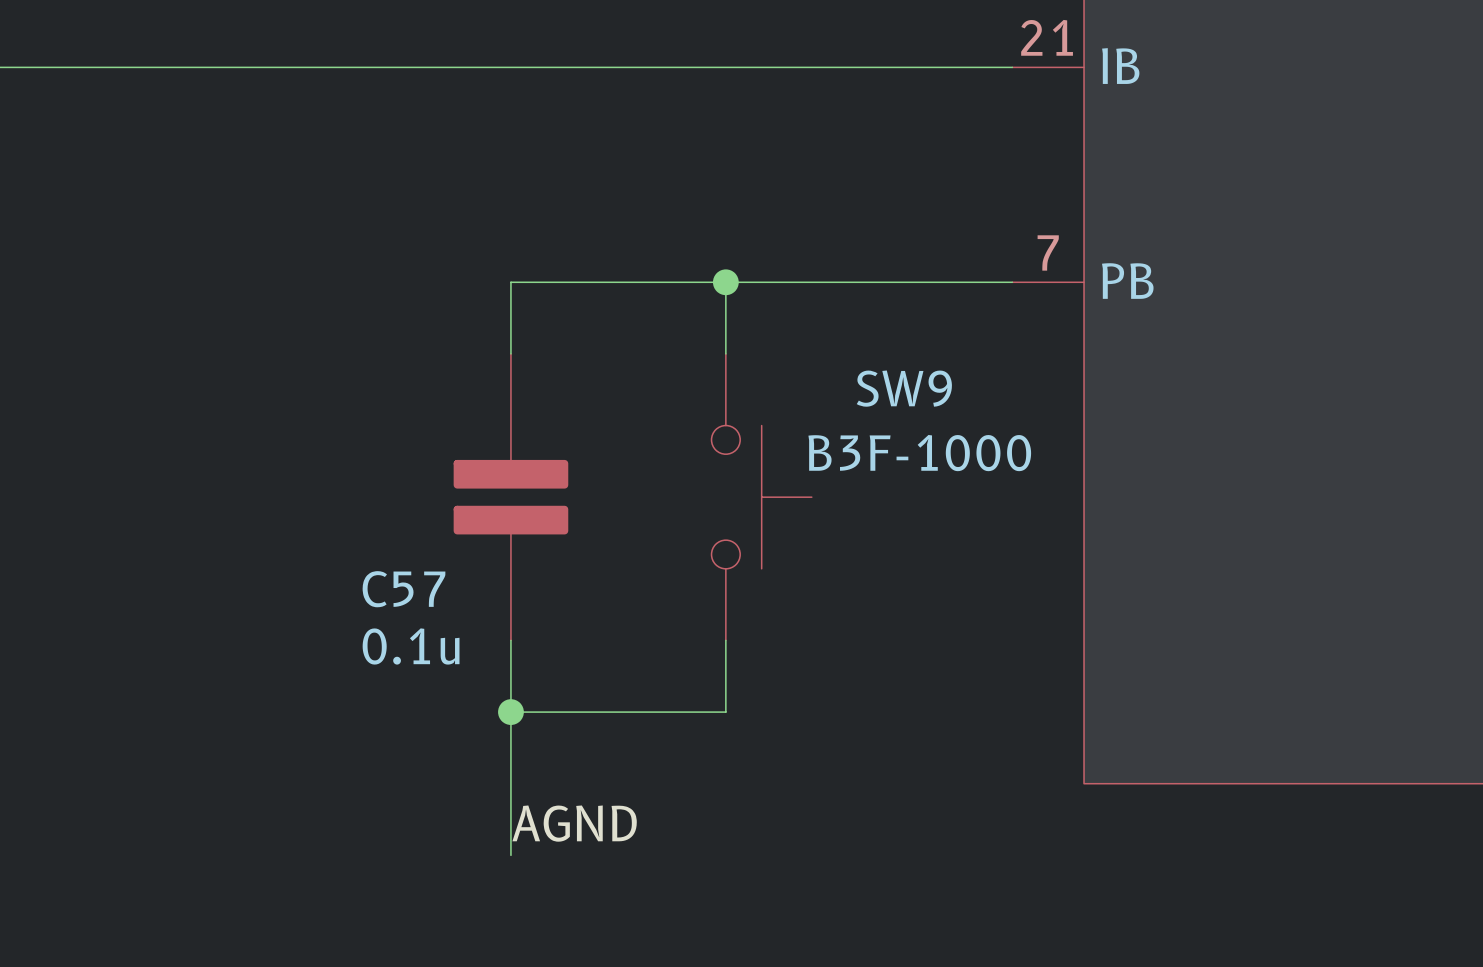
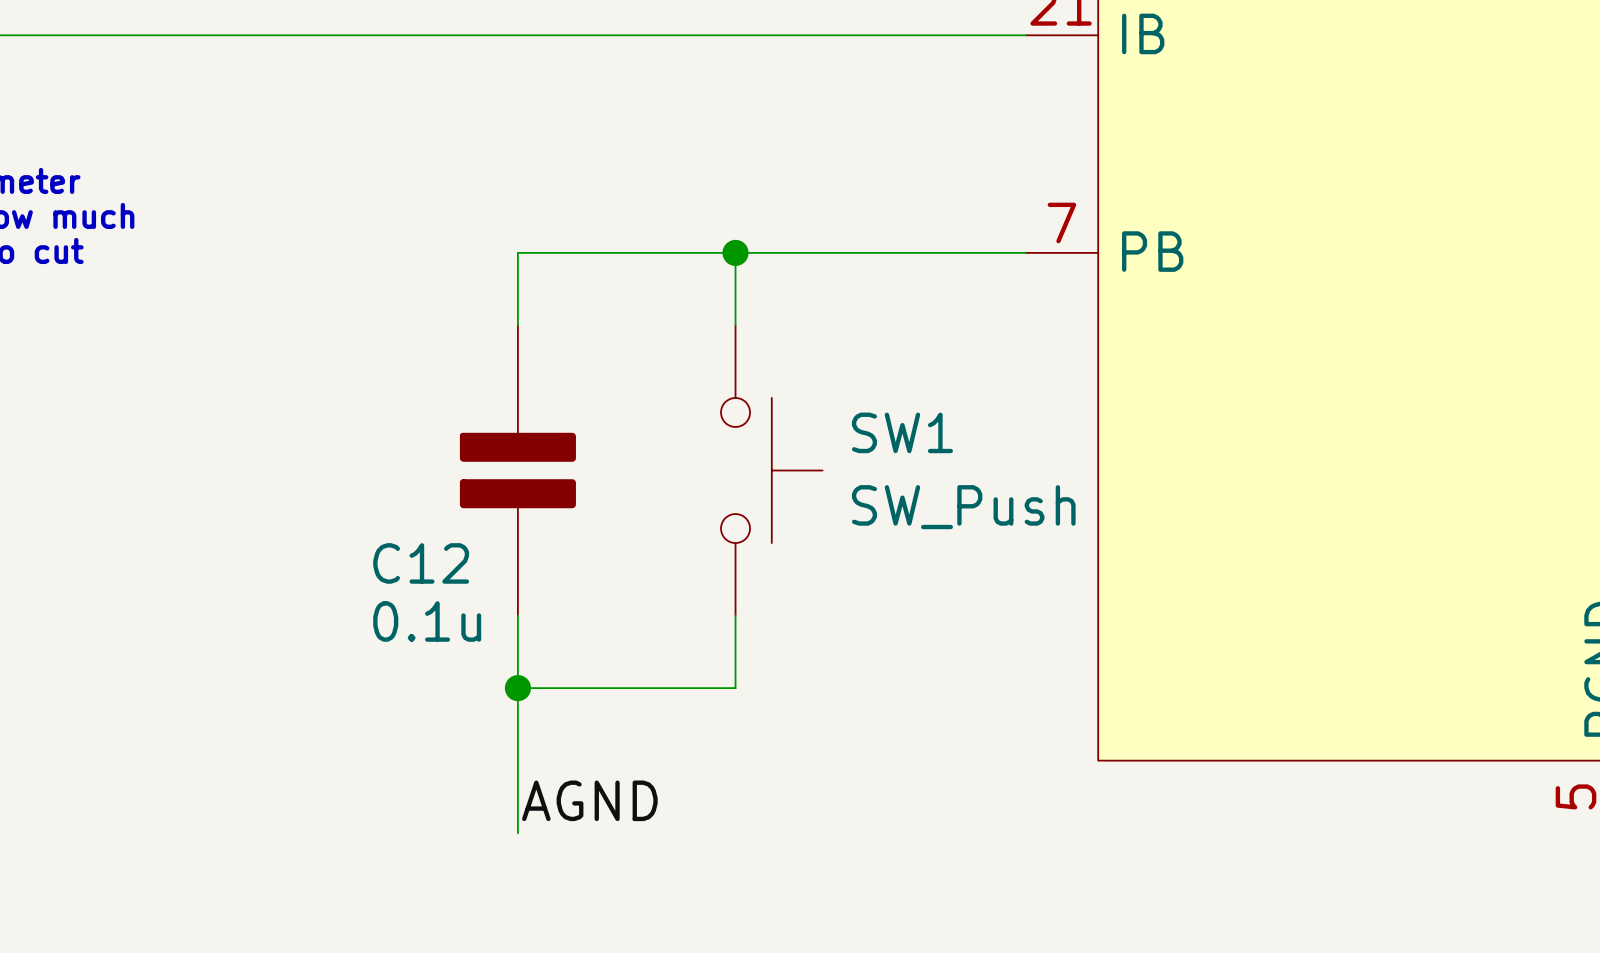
SW9 name: SW9 (904, 388) -> SW1 (902, 432)
SW9 value: B3F-1000 (919, 453) -> SW_Push (963, 507)
C57 name: C57 (403, 589) -> C12 (421, 563)

